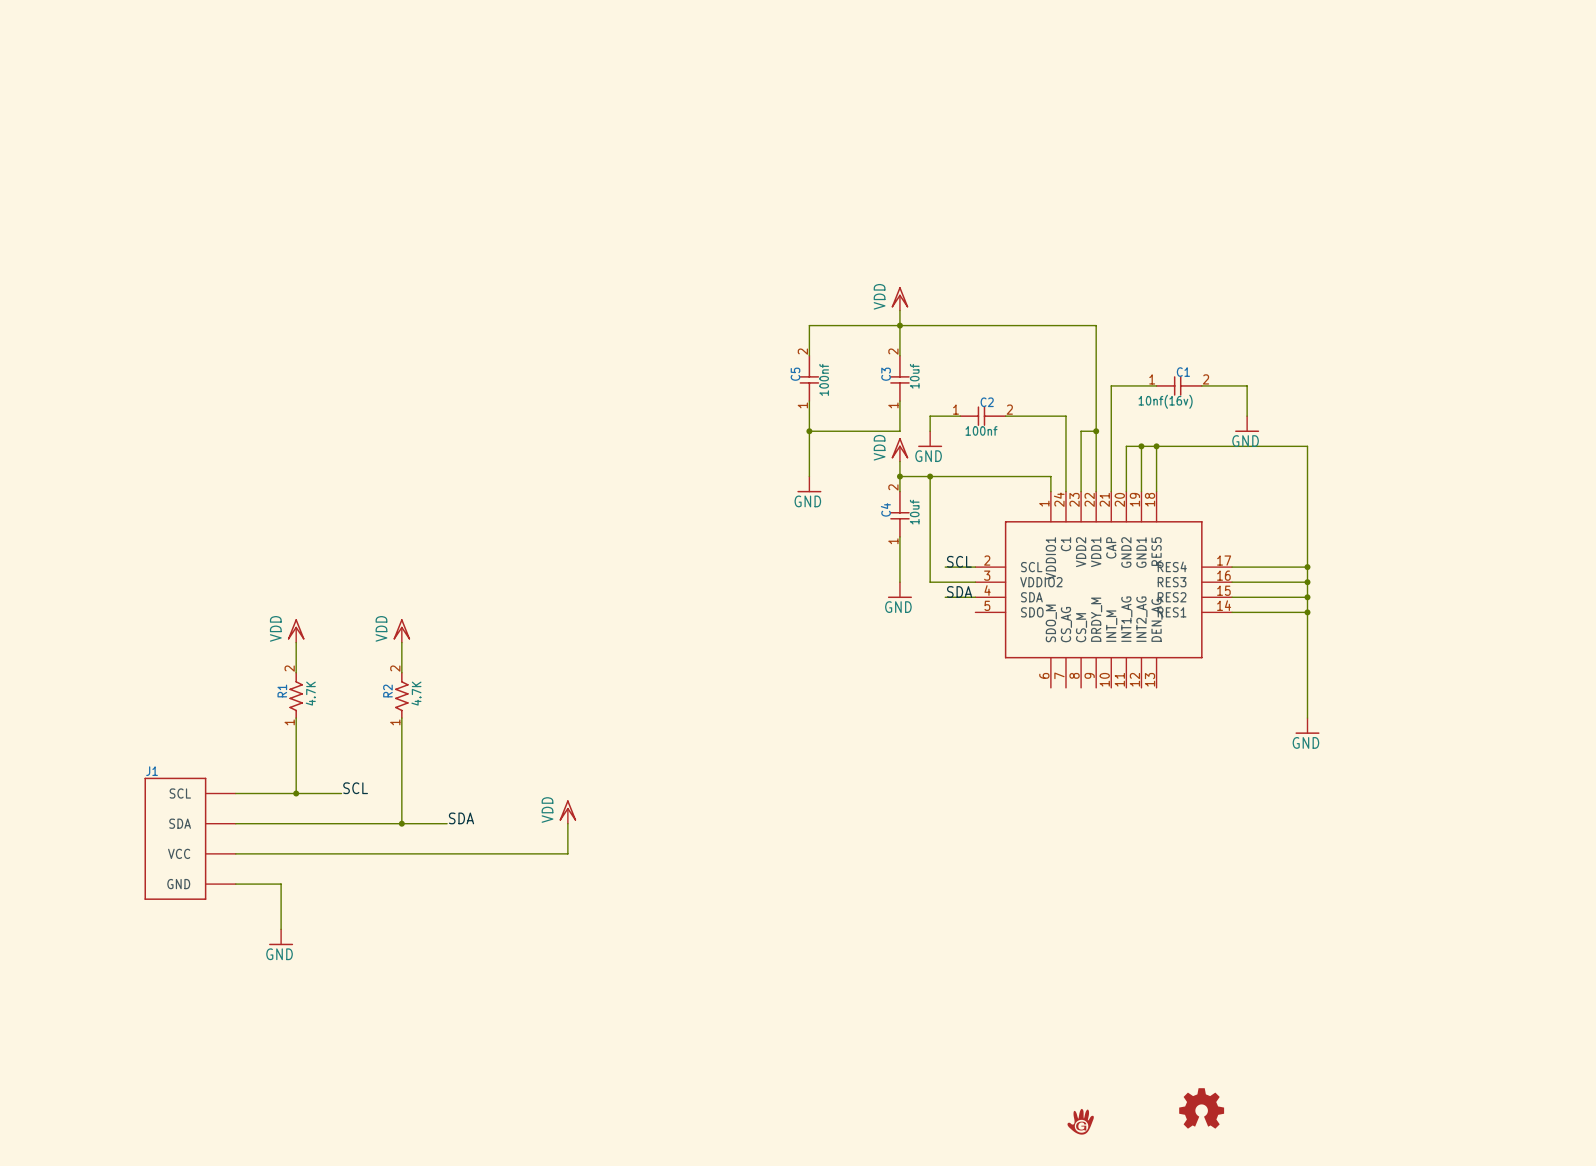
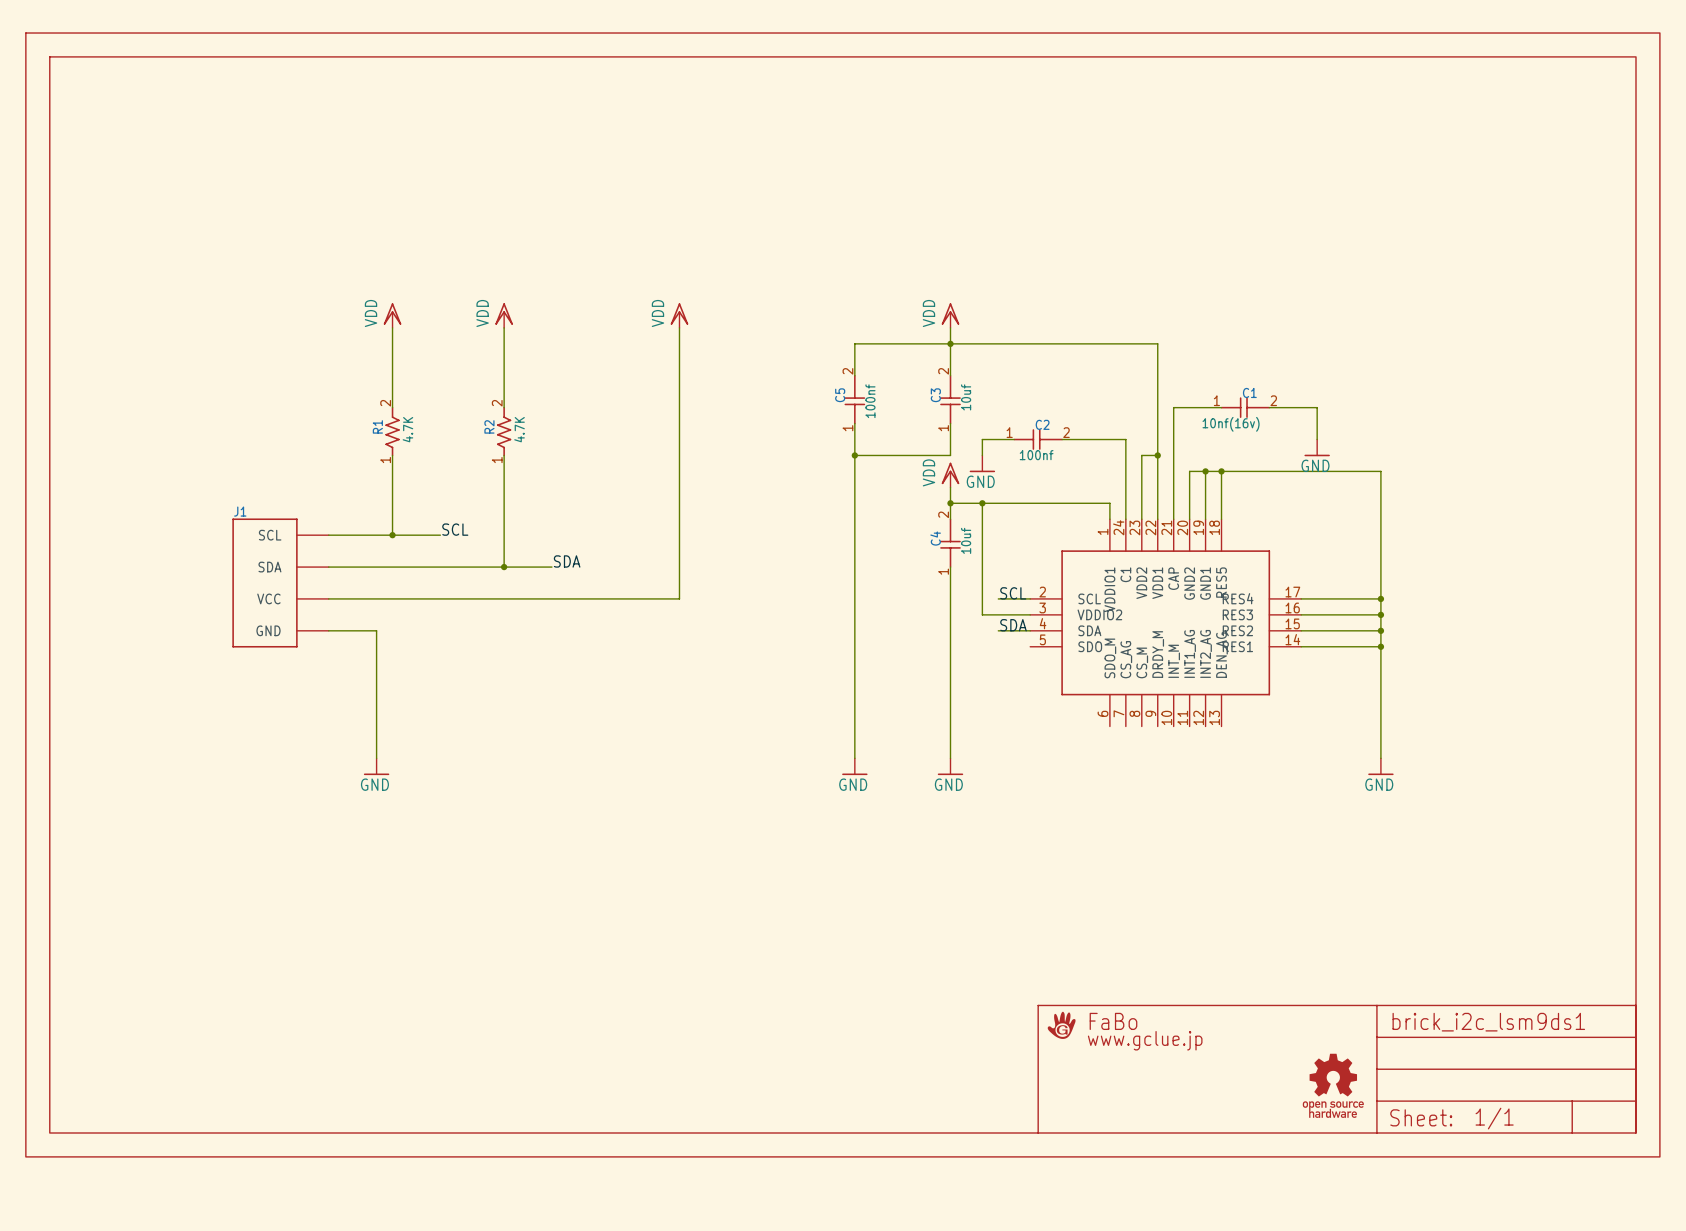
power symbol: none -> VDD (392, 315)
power symbol: none -> VDD (504, 315)
power symbol: none -> VDD (679, 315)
wire: none -> (392, 327) (392, 407)
wire: none -> (504, 327) (504, 407)
wire: none -> (679, 327) (679, 598) (328, 598)
wire: none -> (392, 455) (392, 535)
wire: none -> (504, 455) (504, 567)
wire: none -> (854, 503) (854, 758)
power symbol: GND (809, 484) -> none
label: none -> SCL (455, 529)
wire: none -> (328, 535) (440, 535)
junction: none -> (392, 535)
label: none -> SDA (567, 561)
wire: none -> (328, 567) (551, 567)
junction: none -> (504, 567)
part: none -> (842, 594)
wire: none -> (950, 614) (950, 758)
power symbol: GND (899, 590) -> none
wire: none -> (328, 630) (376, 630) (376, 758)
power symbol: VDD (296, 630) -> none
power symbol: VDD (401, 630) -> none
wire: (296, 642) (296, 672) -> none
wire: (401, 642) (401, 672) -> none
R1 position: (296, 695) -> (392, 431)
R2 position: (401, 695) -> (504, 431)
wire: (296, 718) (296, 793) -> none
wire: (401, 718) (401, 823) -> none
power symbol: none -> GND (376, 766)
power symbol: none -> GND (854, 766)
power symbol: none -> GND (950, 766)
label: SCL (355, 788) -> none
wire: (235, 793) (341, 793) -> none
junction: (296, 793) -> none
power symbol: VDD (567, 812) -> none
label: SDA (461, 818) -> none
wire: (235, 823) (447, 823) -> none
junction: (401, 823) -> none
wire: (567, 823) (567, 853) (235, 853) -> none
J1 position: (190, 838) -> (280, 583)
wire: (235, 884) (281, 884) (281, 929) -> none
power symbol: GND (281, 937) -> none
part: none -> (1333, 1085)
part: (1201, 1108) -> none
part: (1080, 1121) -> none

